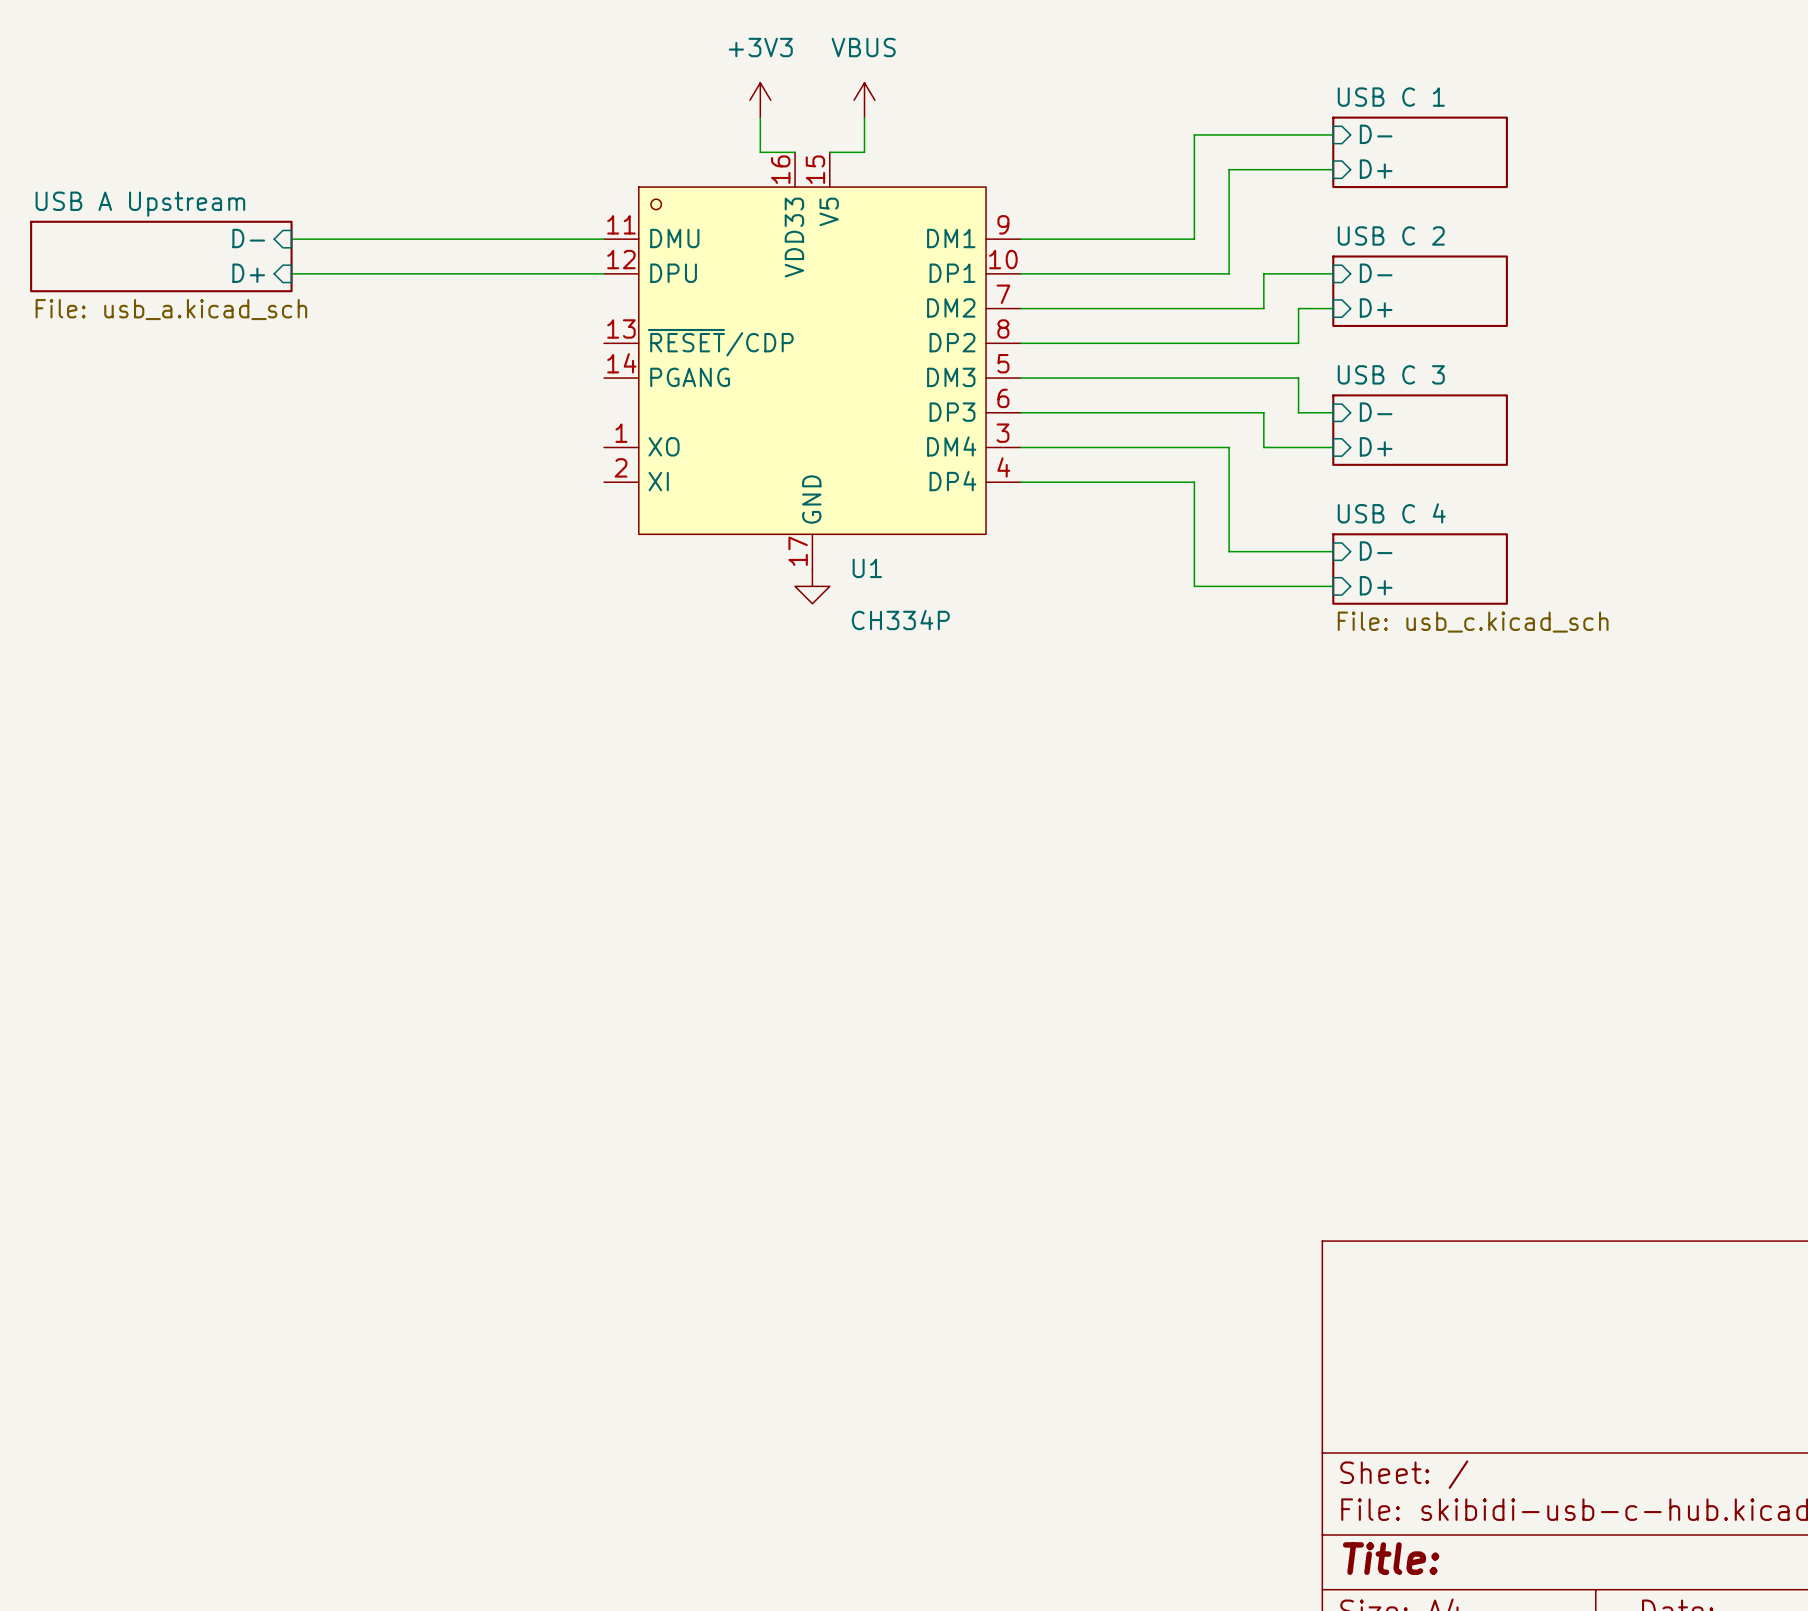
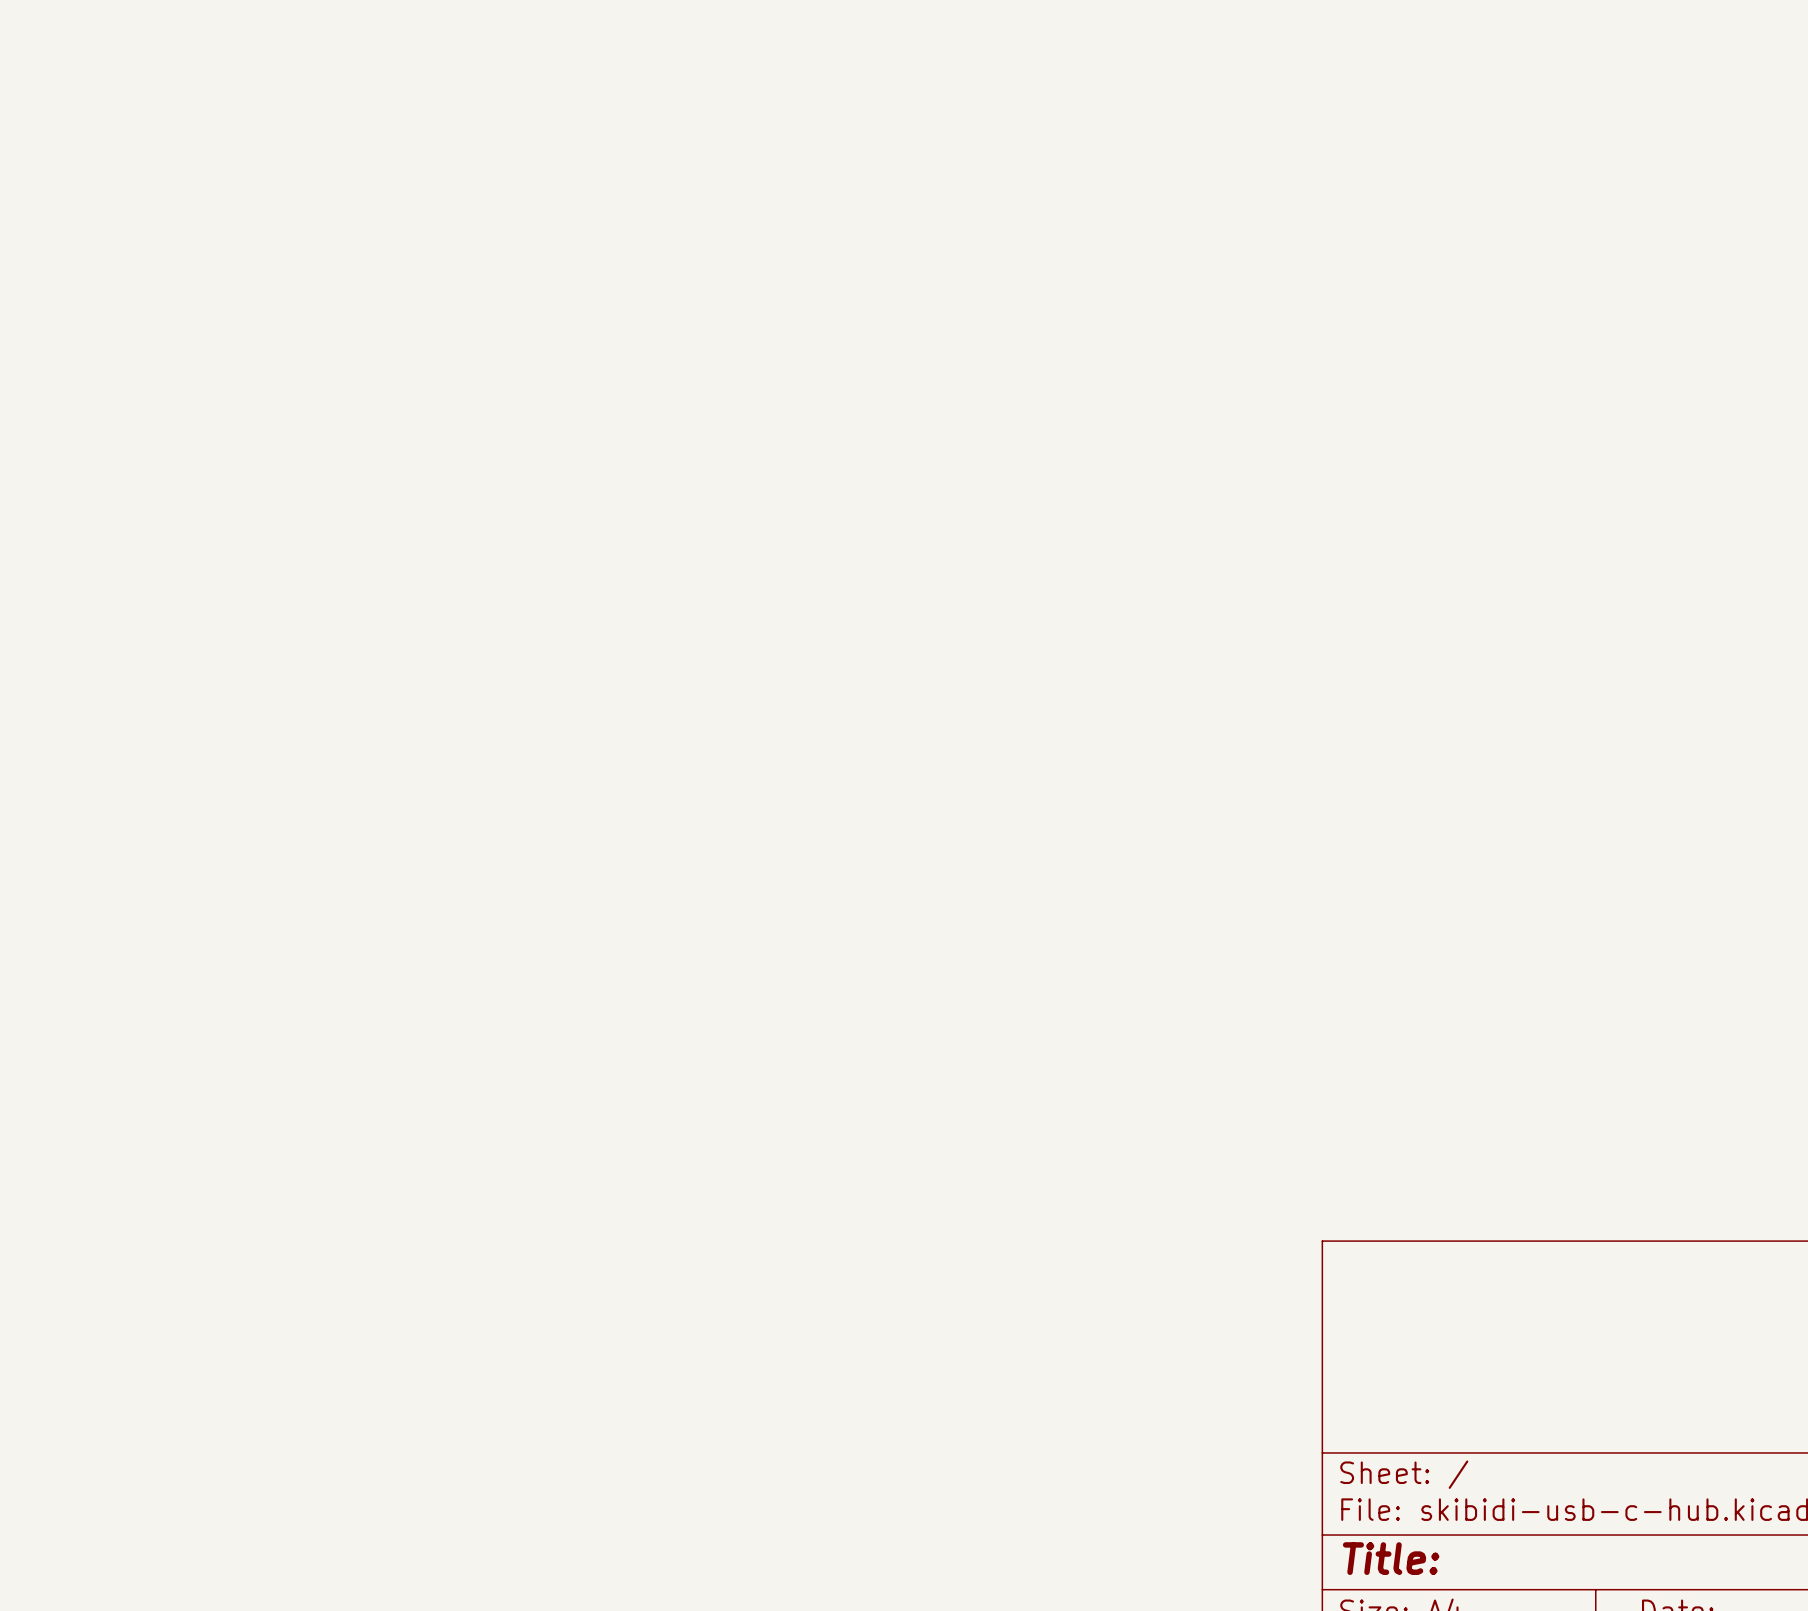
power symbol: +3V3 (760, 100) -> none
power symbol: VBUS (864, 100) -> none
wire: (760, 117) (760, 152) (795, 152) -> none
wire: (864, 117) (864, 152) (829, 152) -> none
wire: (1333, 134) (1194, 134) (1194, 239) (1020, 239) -> none
sheet pin: D- (1376, 134) -> none
sheet USB C 1: (1420, 152) -> none
wire: (1333, 169) (1229, 169) (1229, 273) (1020, 273) -> none
sheet pin: D+ (1376, 169) -> none
sheet pin: D- (248, 238) -> none
wire: (291, 239) (604, 239) -> none
sheet USB A Upstream: File: usb_a.kicad_sch (161, 256) -> none
sheet pin: D+ (248, 273) -> none
wire: (291, 273) (604, 273) -> none
wire: (1333, 273) (1263, 273) (1263, 308) (1020, 308) -> none
sheet pin: D- (1376, 273) -> none
sheet USB C 2: (1420, 291) -> none
sheet pin: D+ (1376, 307) -> none
wire: (1333, 308) (1298, 308) (1298, 343) (1020, 343) -> none
U1: CH334P (812, 360) -> none
wire: (1020, 378) (1298, 378) (1298, 412) (1333, 412) -> none
wire: (1020, 412) (1263, 412) (1263, 447) (1333, 447) -> none
sheet pin: D- (1376, 412) -> none
sheet USB C 3: (1420, 430) -> none
sheet pin: D+ (1376, 446) -> none
wire: (1020, 447) (1229, 447) (1229, 551) (1333, 551) -> none
wire: (1020, 482) (1194, 482) (1194, 586) (1333, 586) -> none
sheet pin: D- (1376, 551) -> none
sheet USB C 4: File: usb_c.kicad_sch (1420, 569) -> none
sheet pin: D+ (1376, 585) -> none
power symbol: (812, 586) -> none

